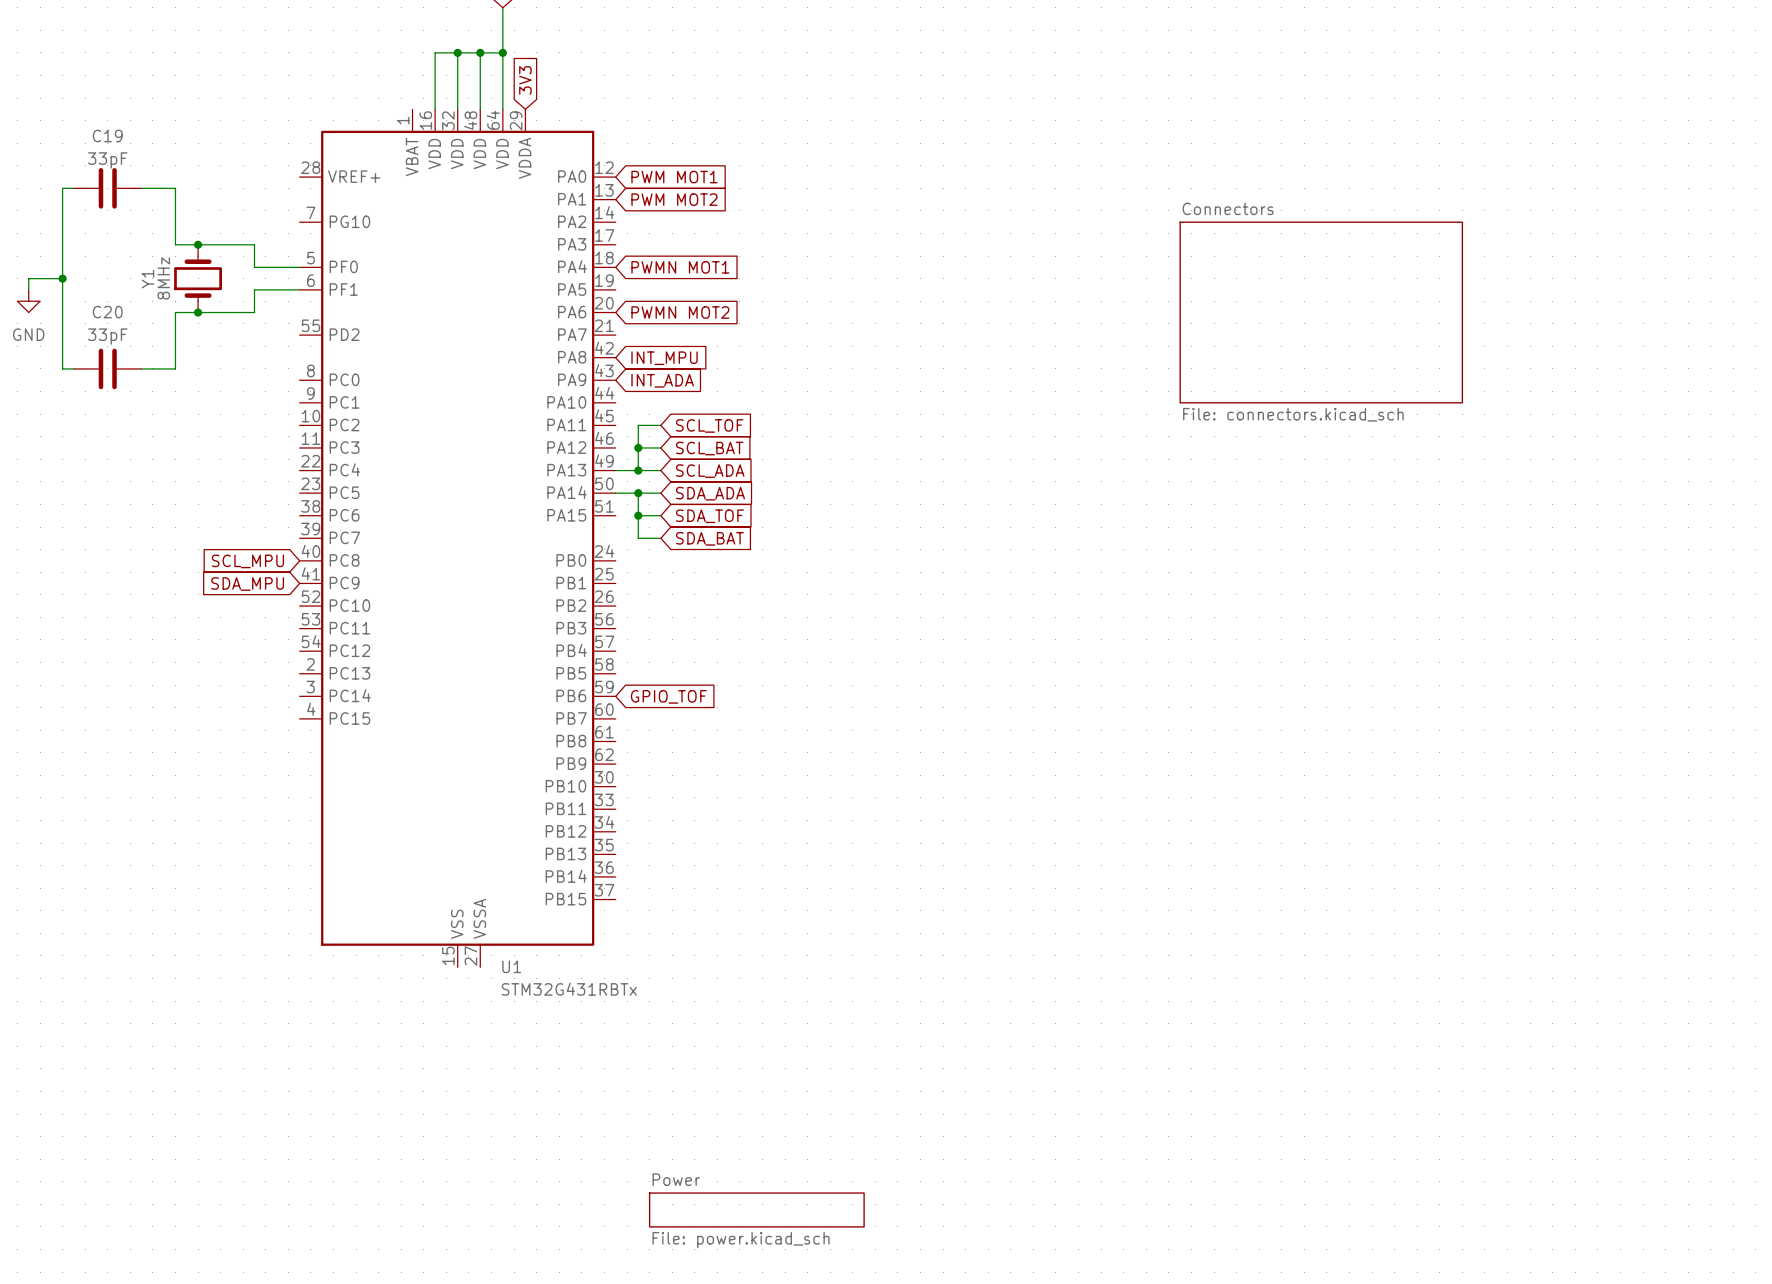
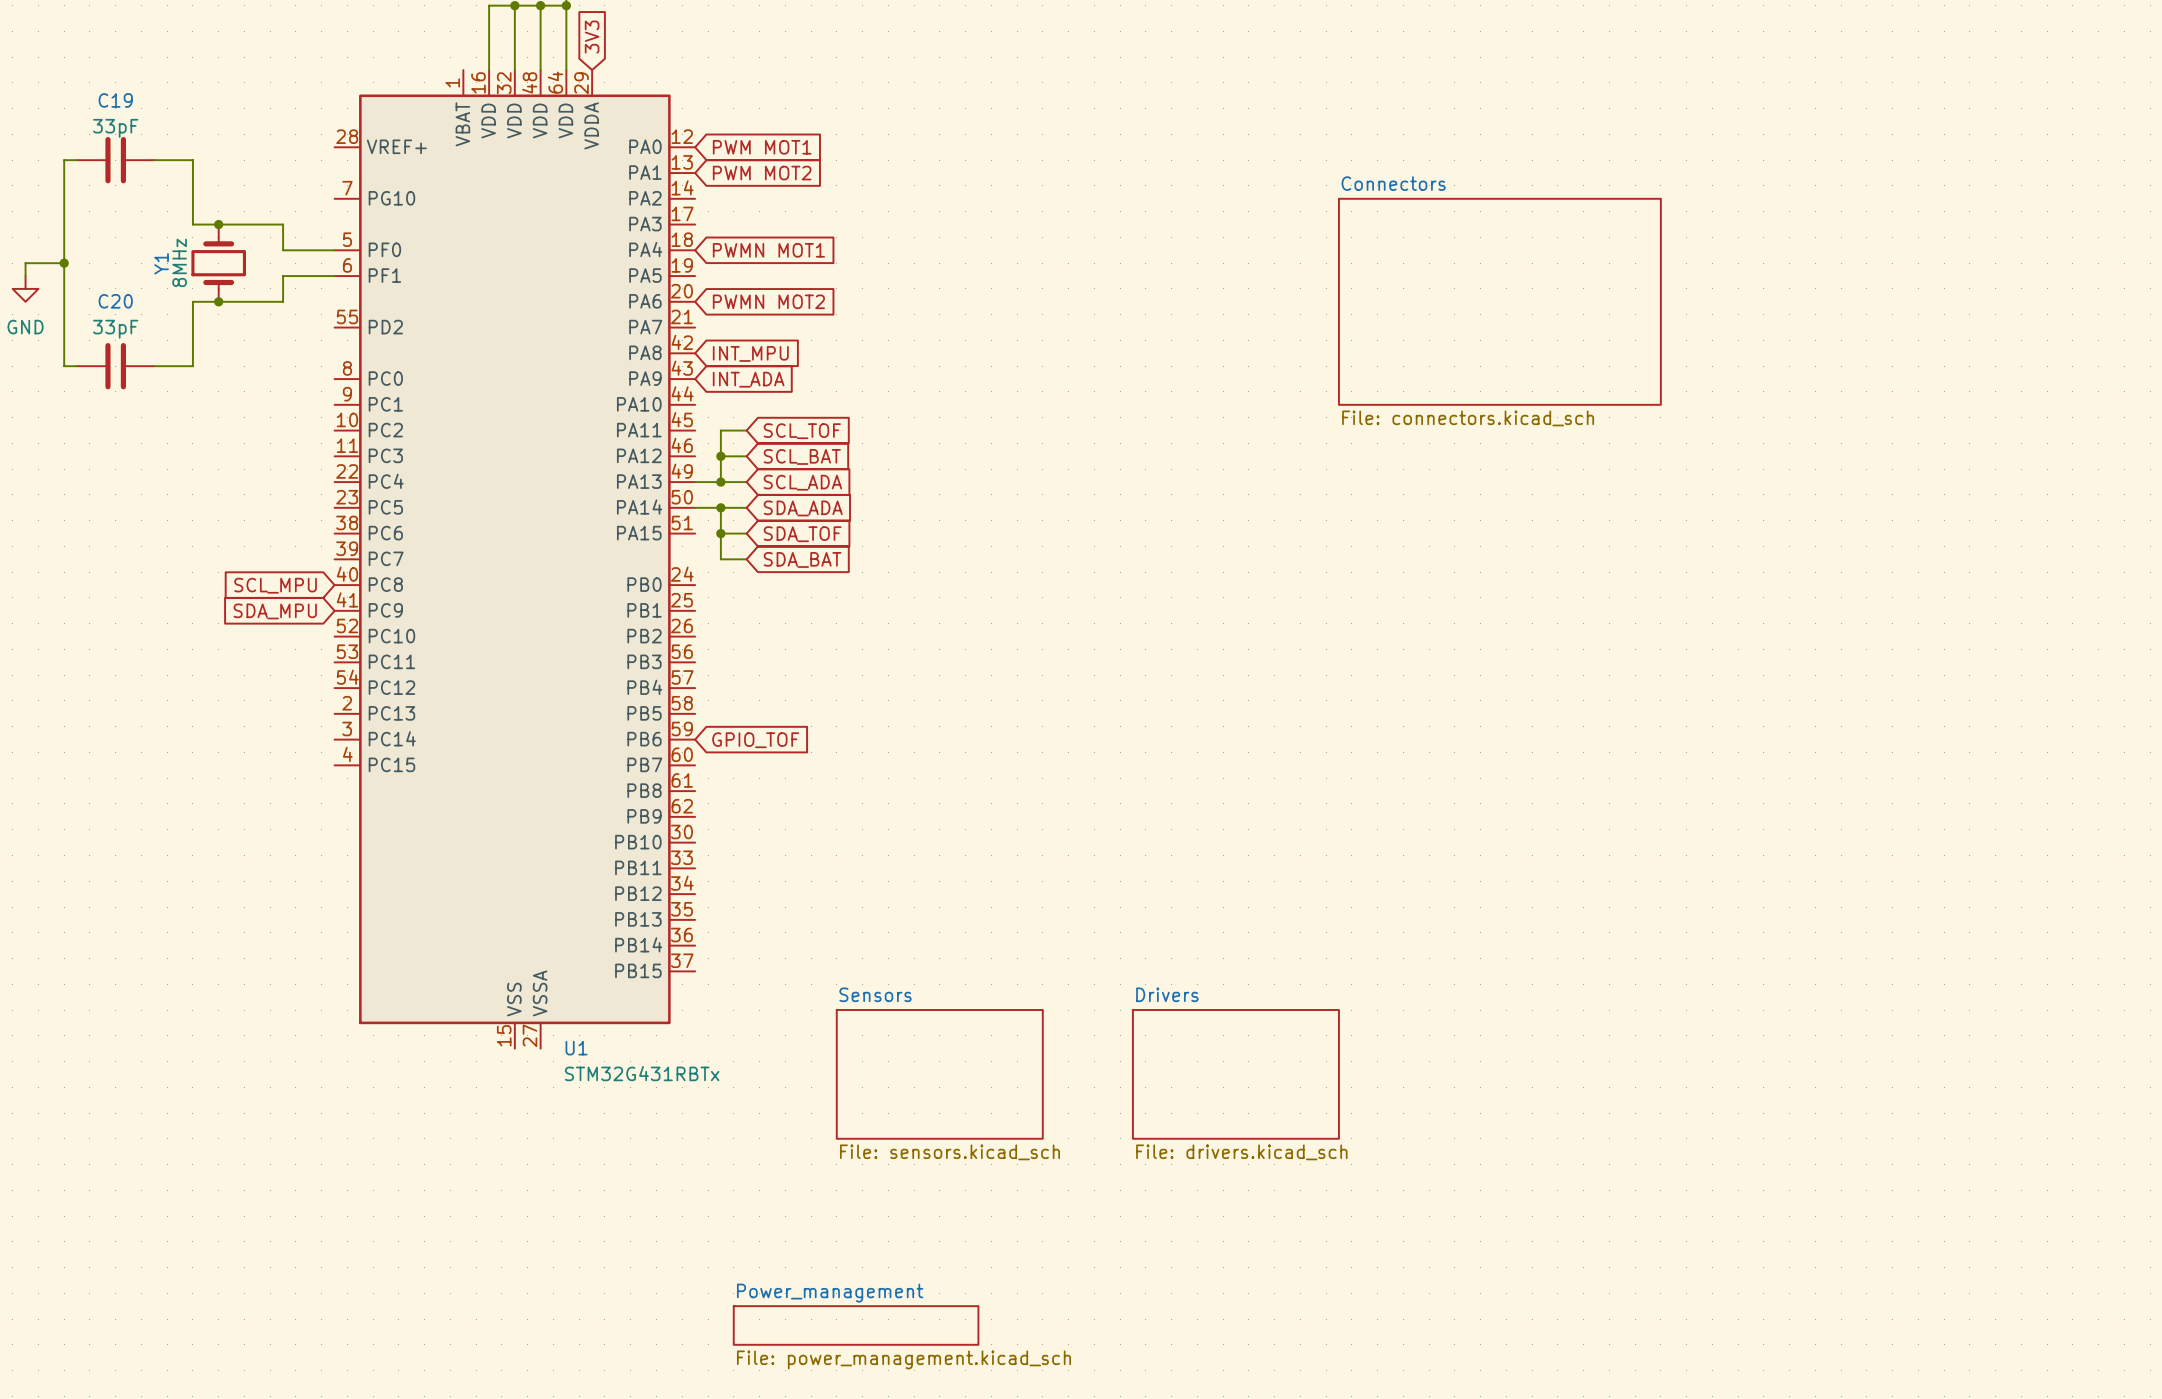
sheet Sensors: none -> File: sensors.kicad_sch (939, 1074)
sheet Drivers: none -> File: drivers.kicad_sch (1235, 1074)
sheet Power name: Power (676, 1179) -> Power_management (830, 1293)
sheet Power value: File: power.kicad_sch (741, 1240) -> File: power_management.kicad_sch (904, 1359)

